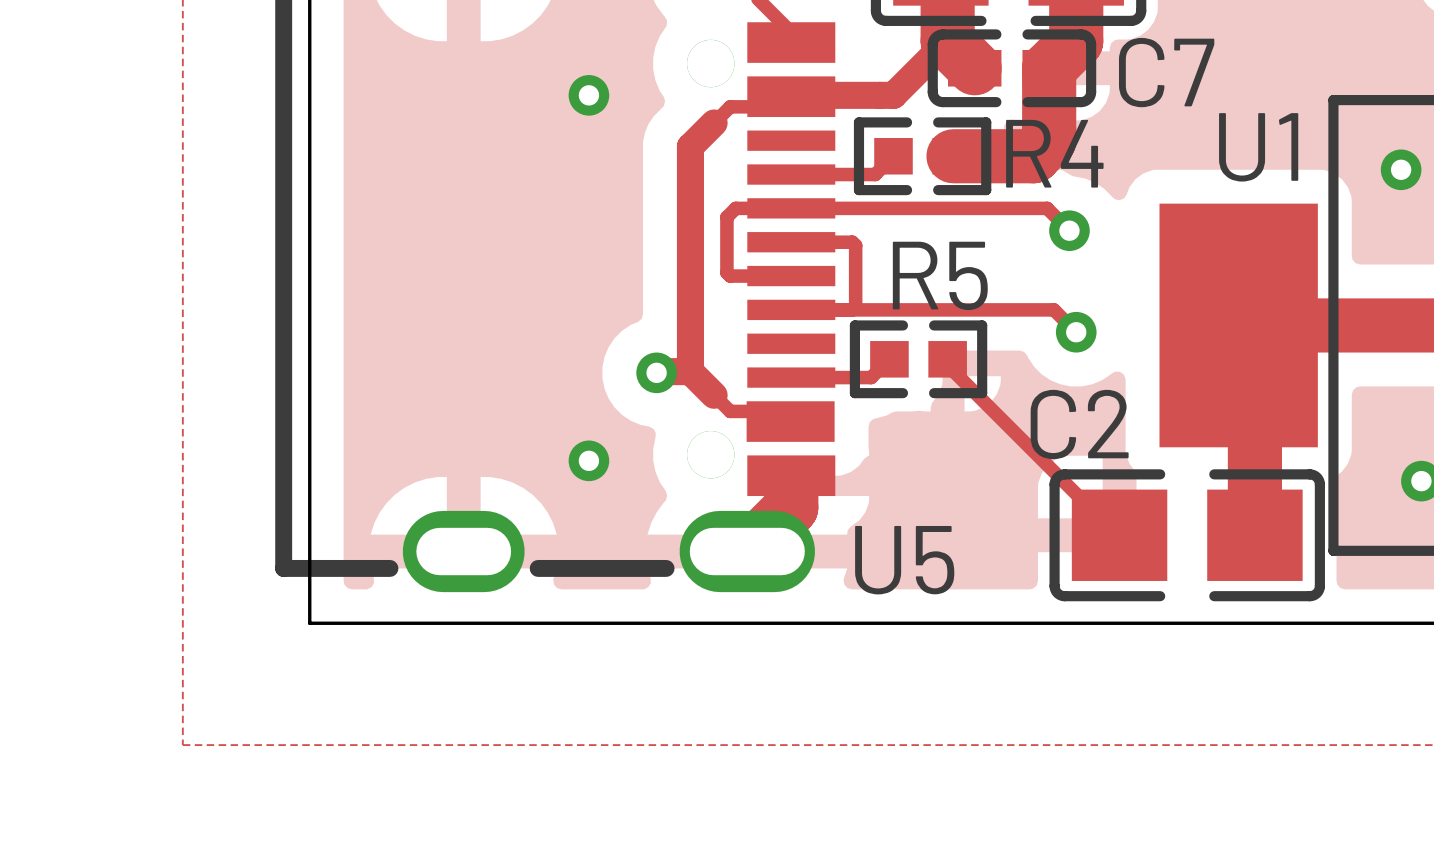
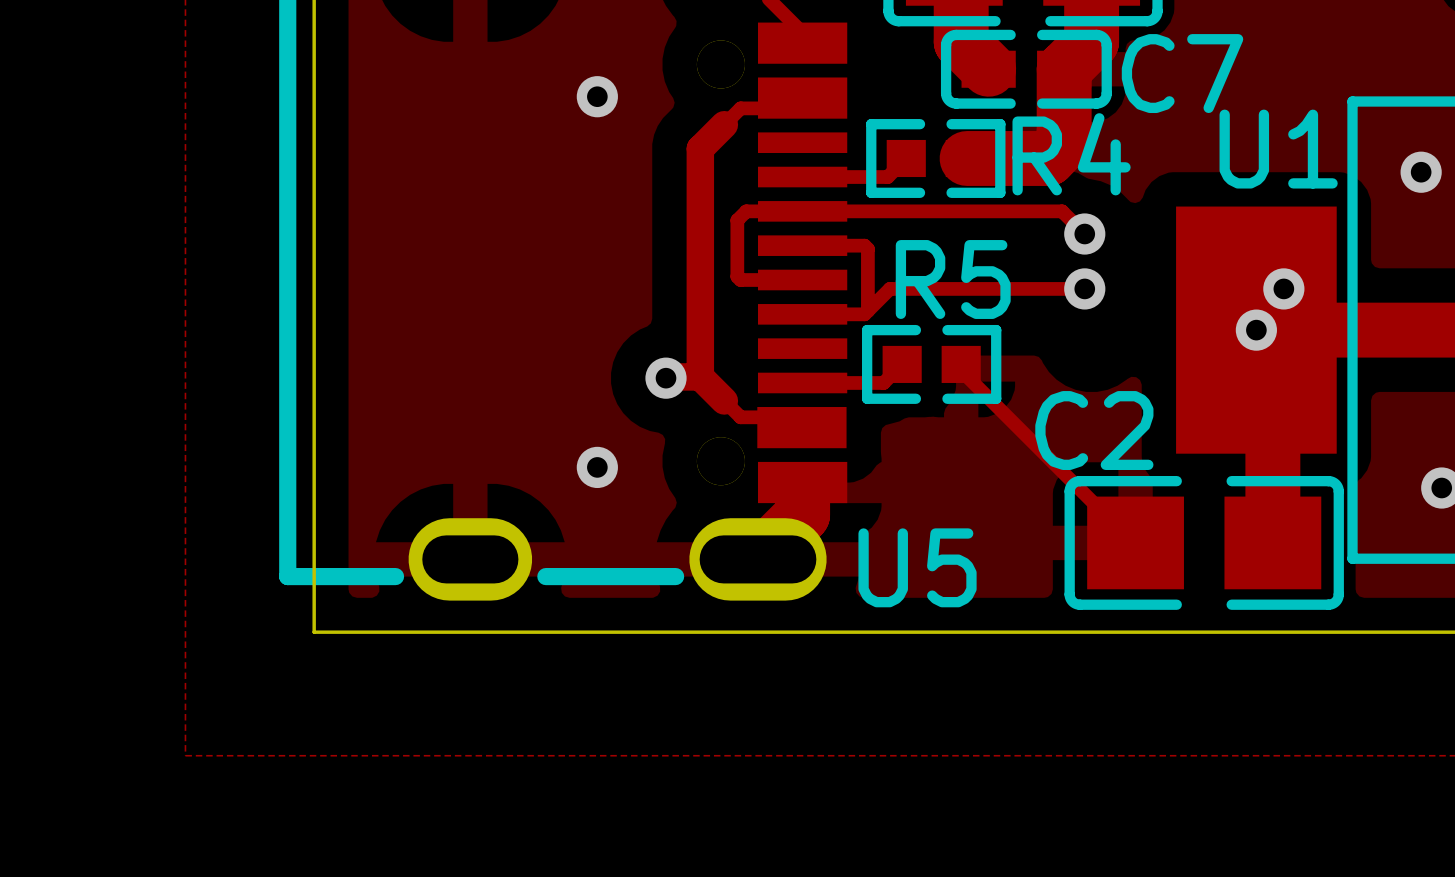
track: (947, 41) (893, 95) (800, 95) -> none
track: none -> (1084, 288) (889, 288) (867, 310)
via: none -> (1283, 288)
track: (852, 309) (1053, 309) (1076, 332) -> none
via: none -> (1256, 330)
via position: (1076, 332) -> (1084, 288)

